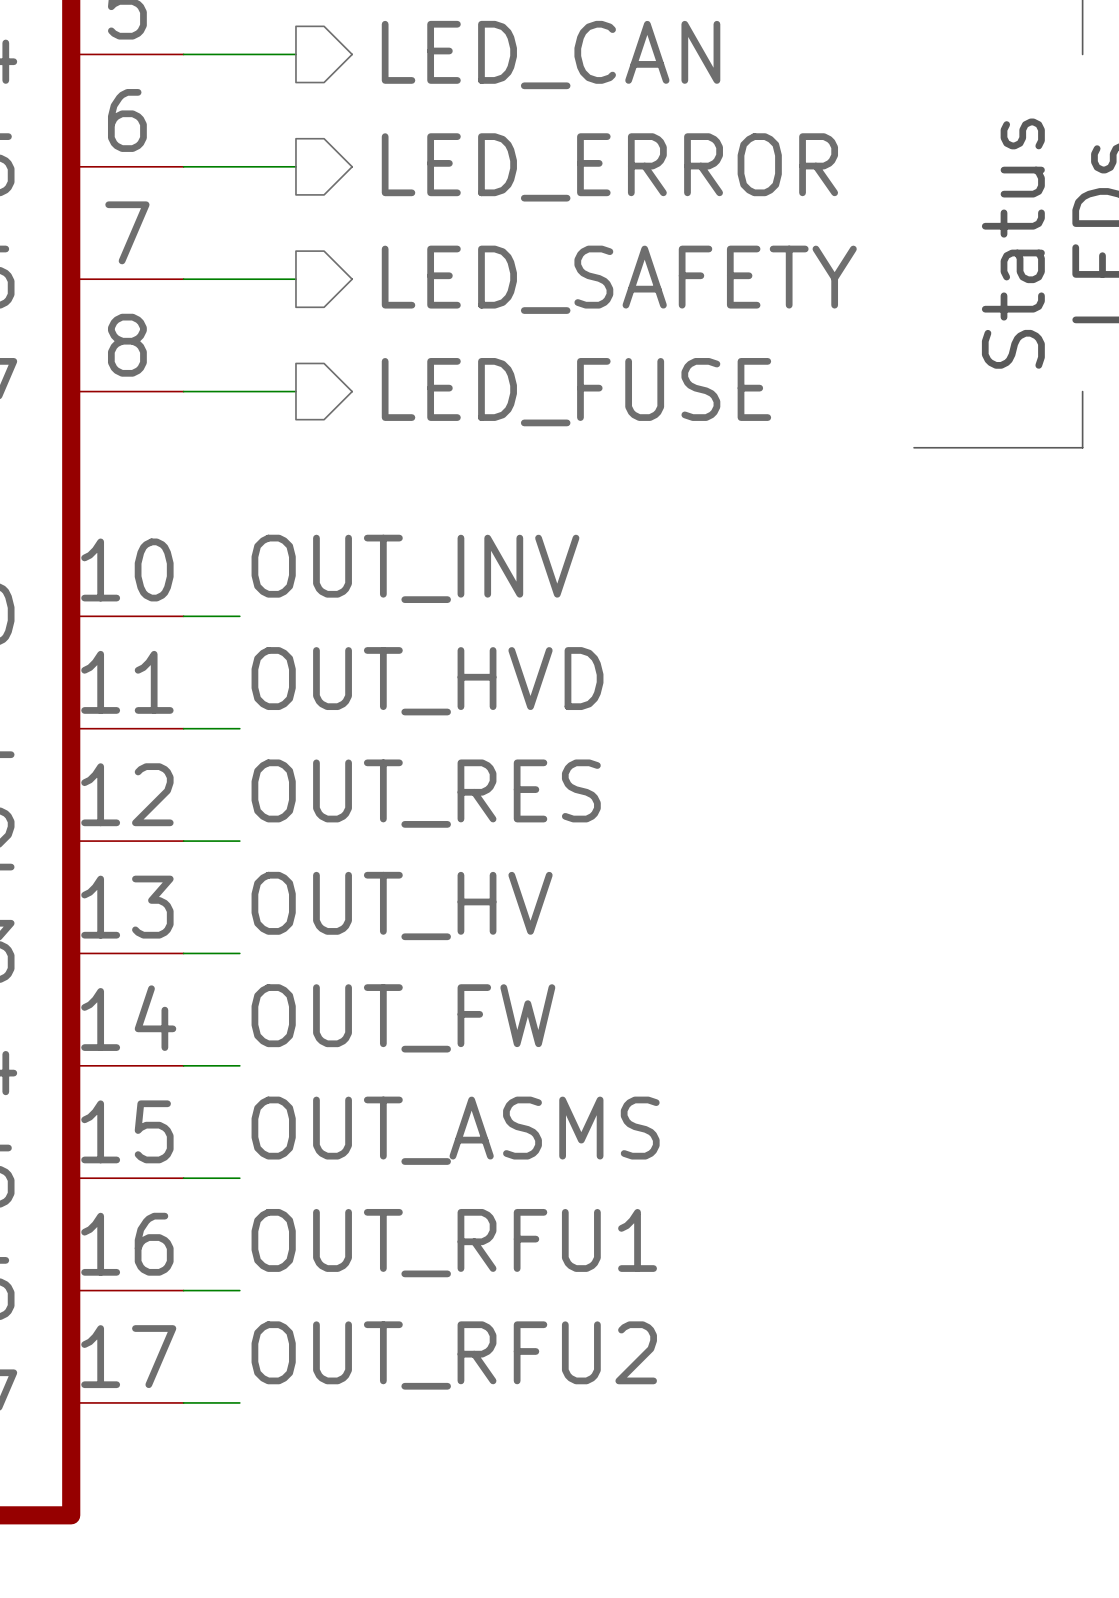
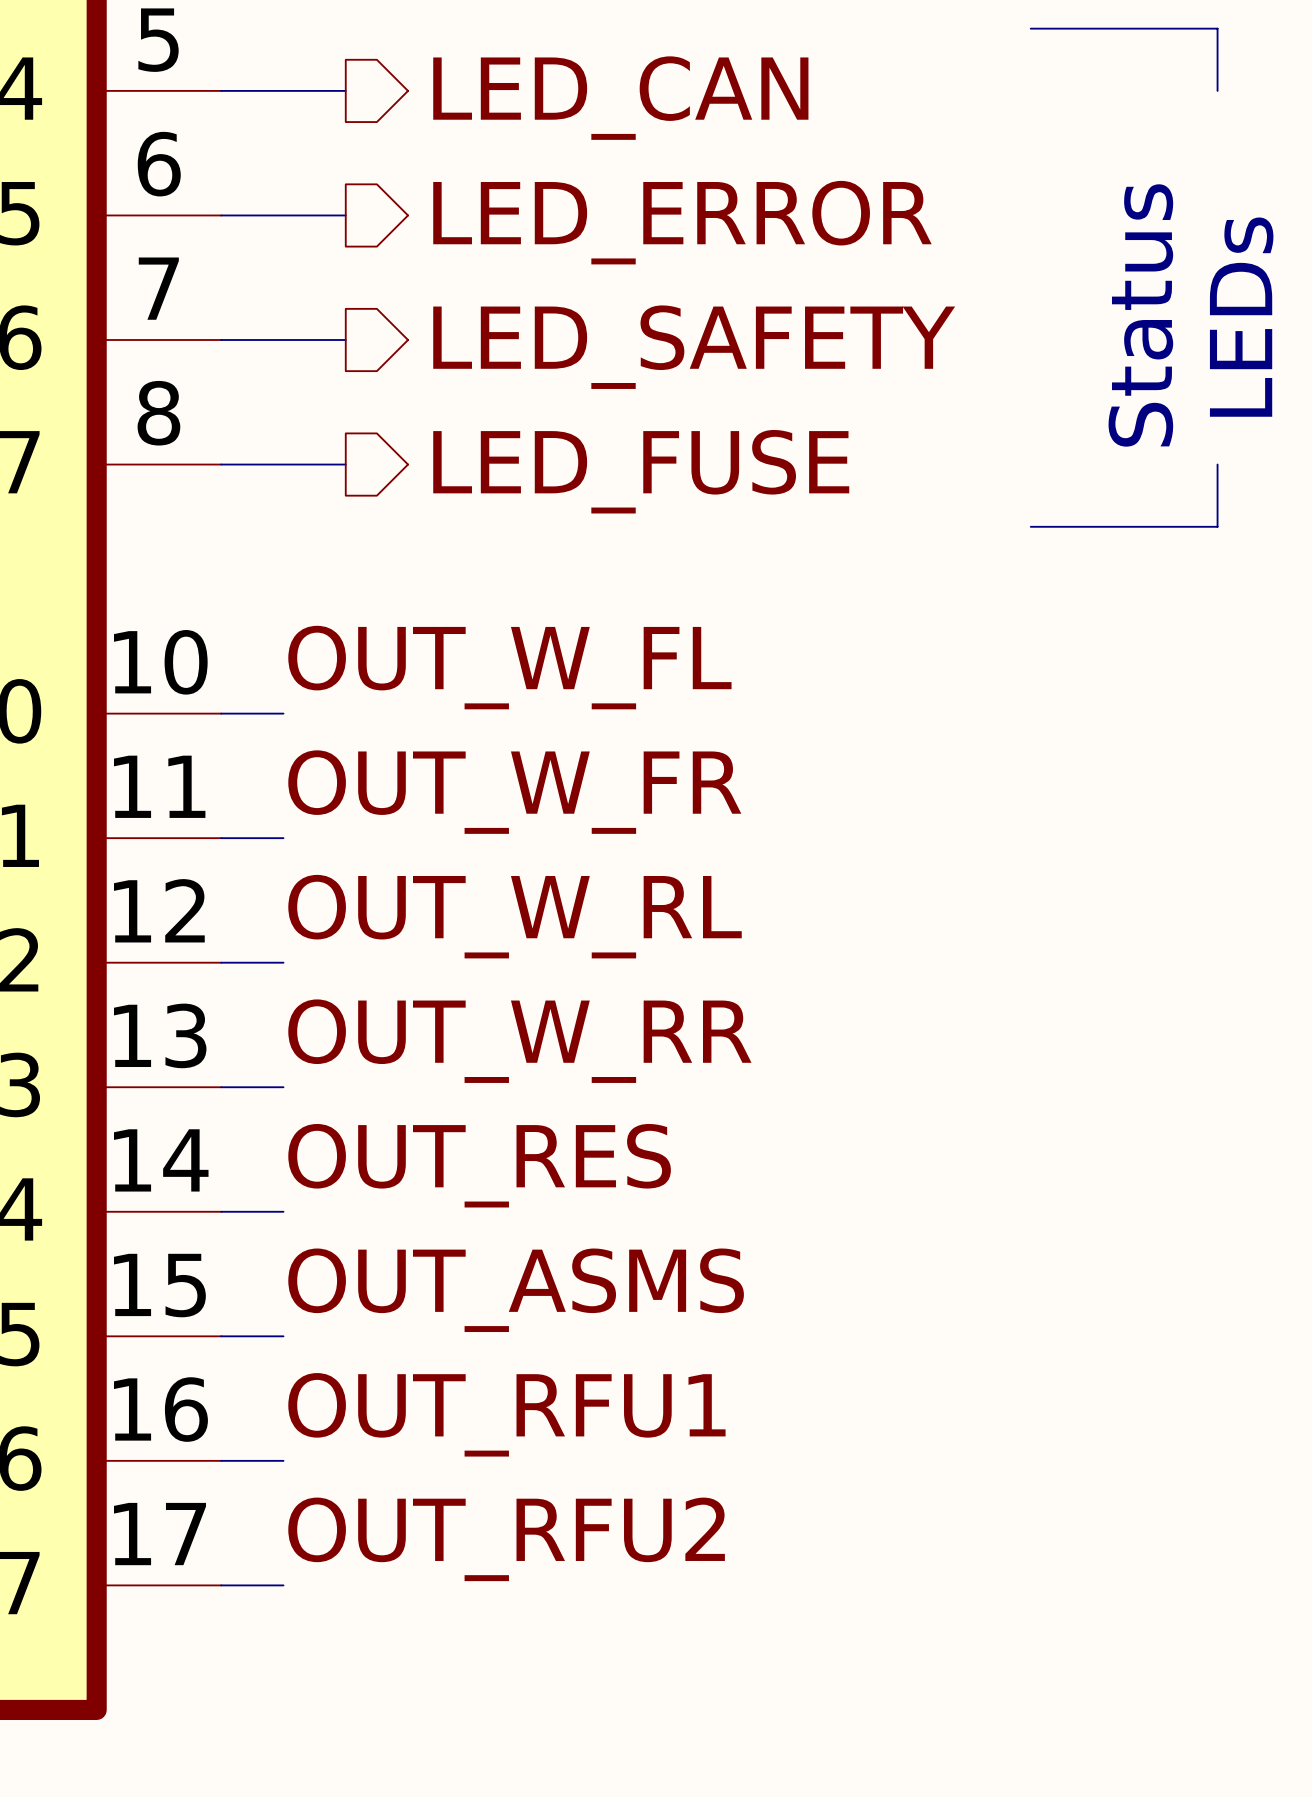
label: OUT_INV (415, 568) -> OUT_W_FL (509, 667)
label: OUT_HVD (427, 681) -> OUT_W_FR (514, 792)
label: OUT_RES (426, 793) -> OUT_W_RL (515, 916)
label: OUT_HV (402, 905) -> OUT_W_RR (519, 1041)
label: OUT_FW (403, 1018) -> OUT_RES (479, 1165)

